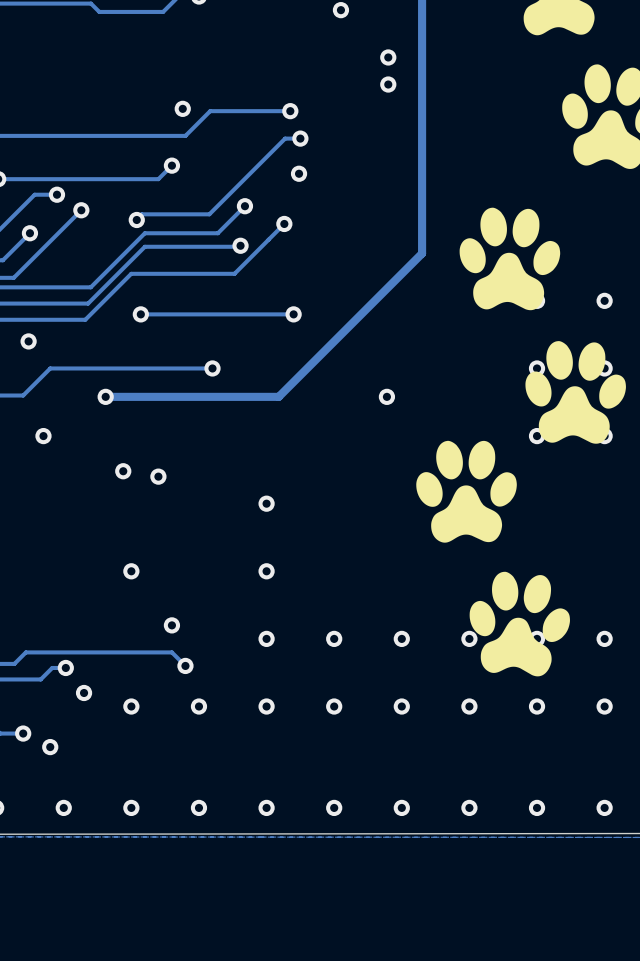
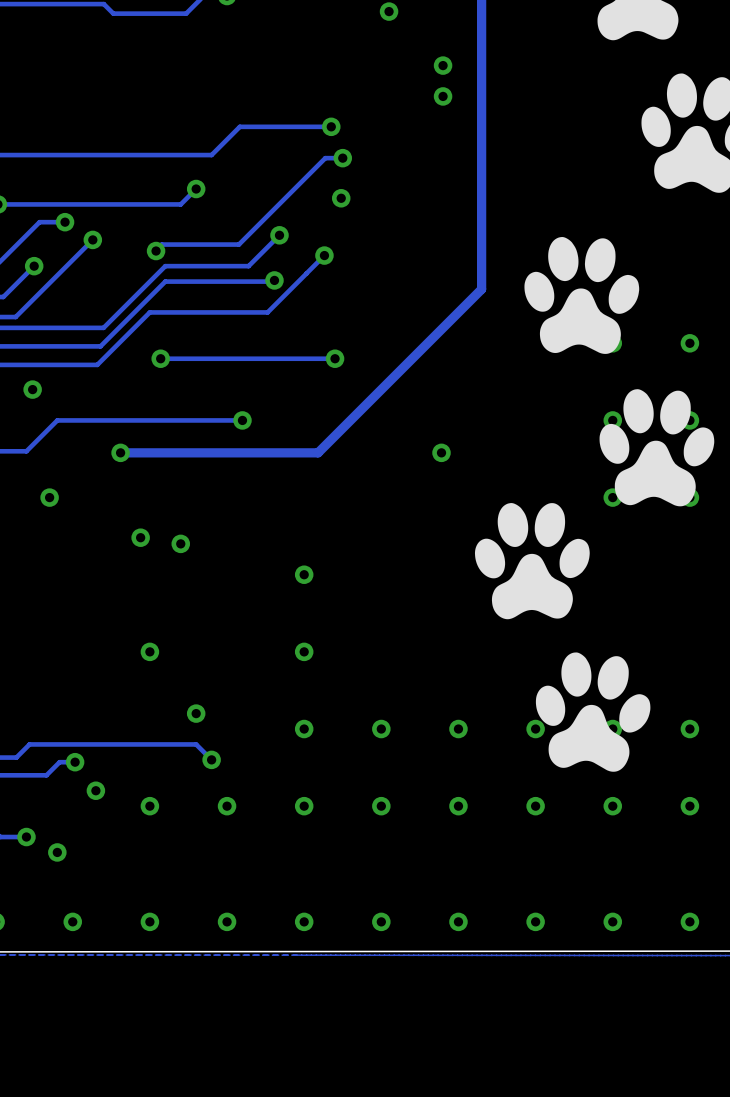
via: (182, 108) -> none

